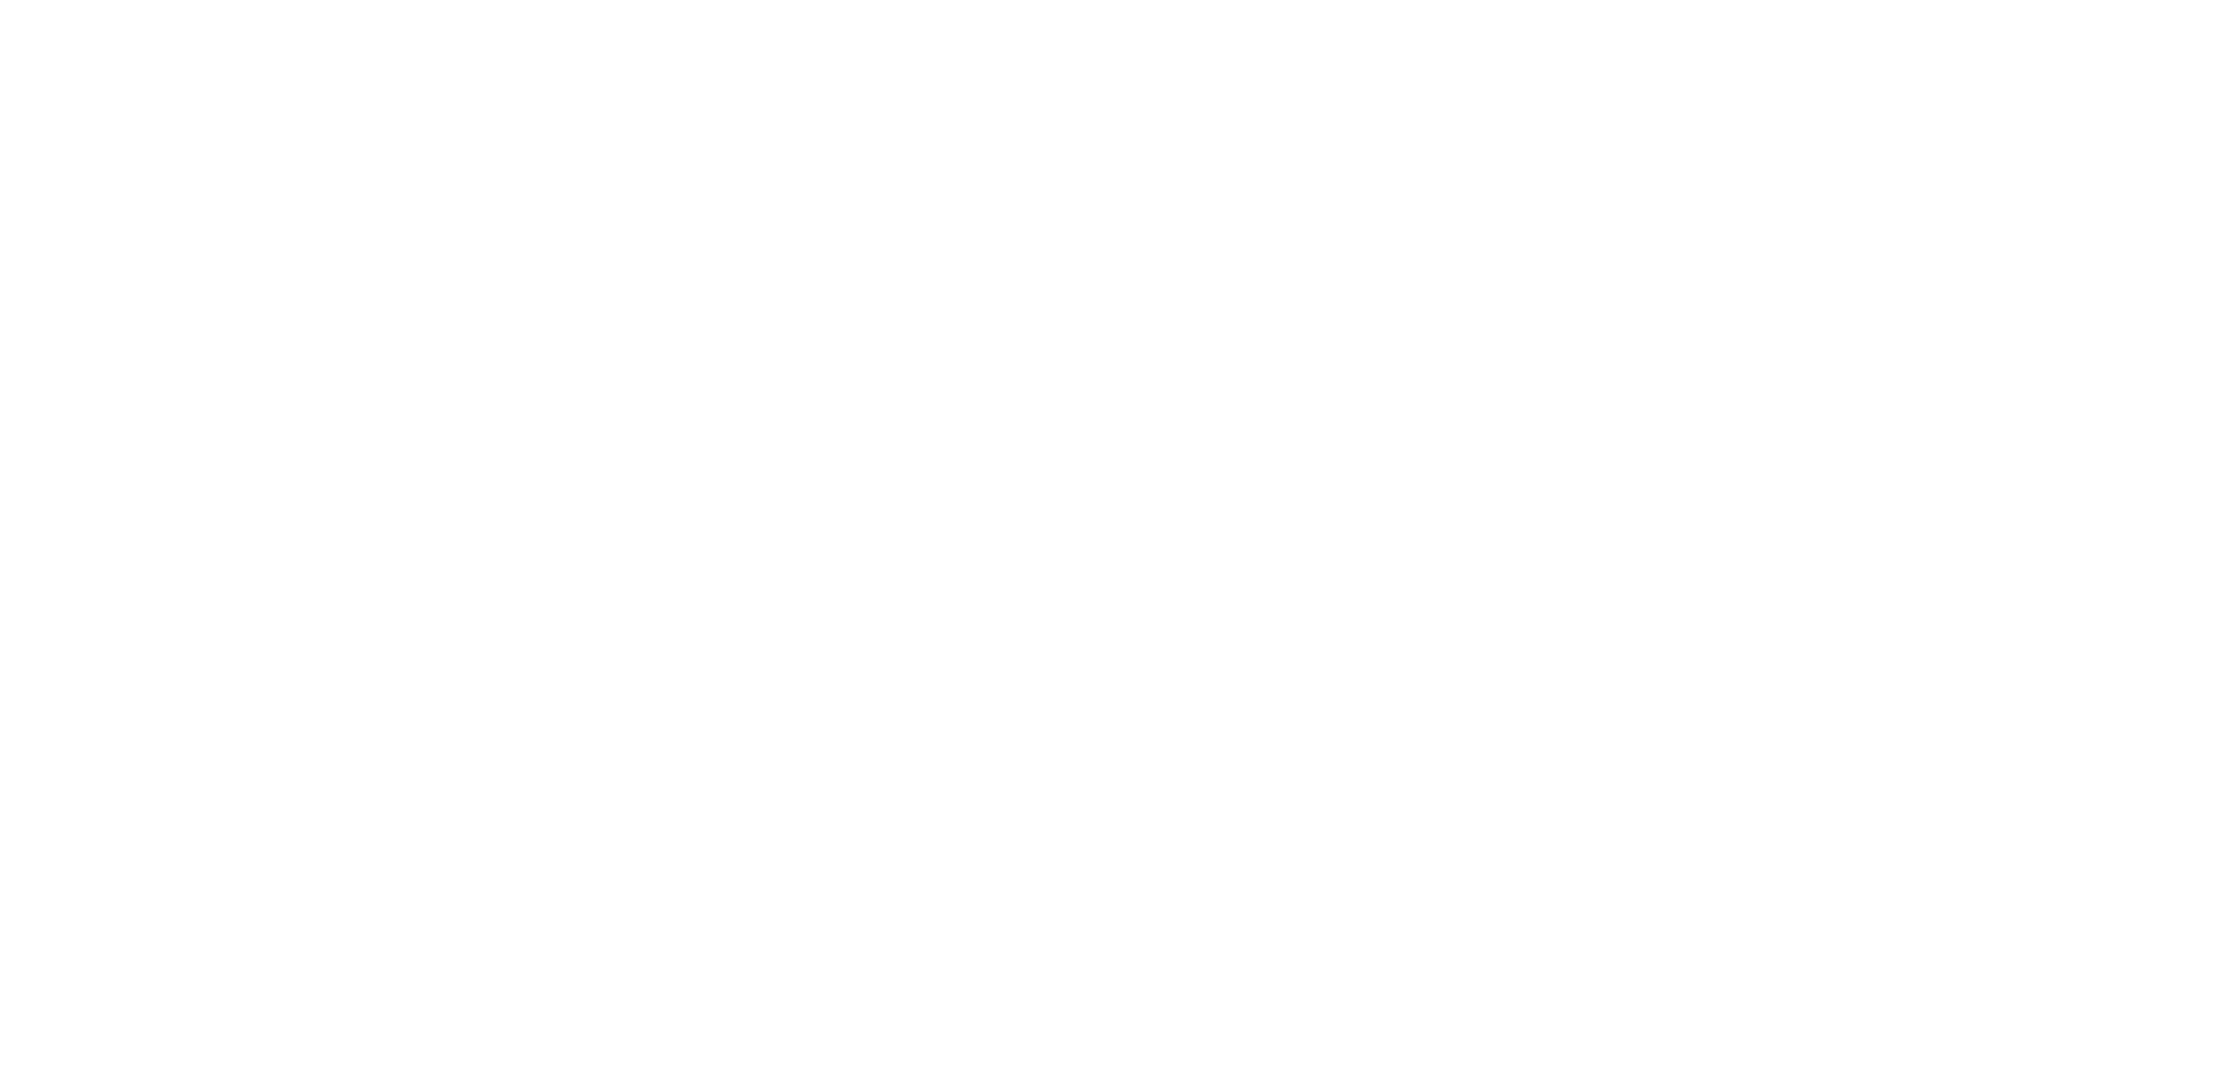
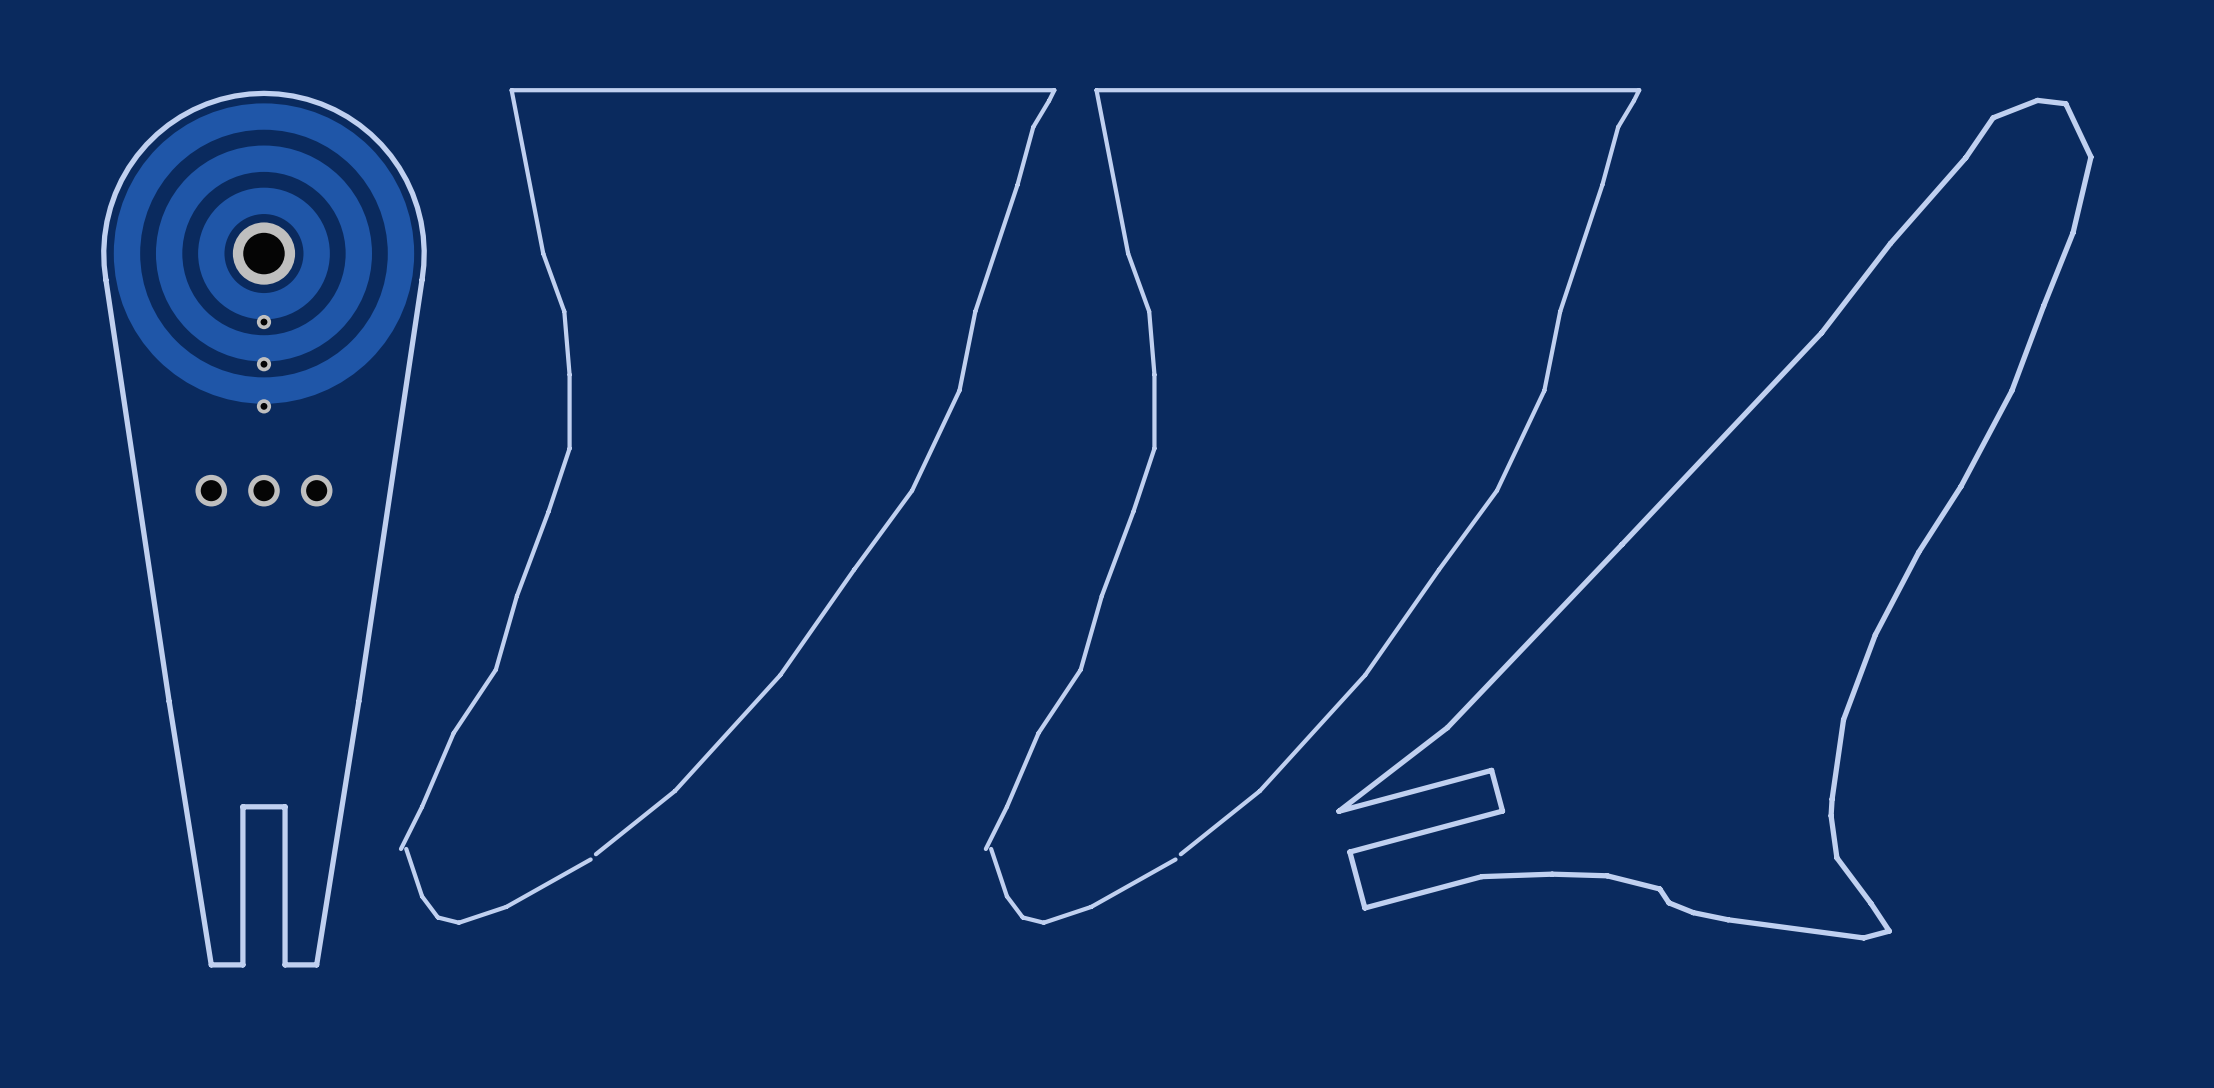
board edge: none -> (2037, 100) (1993, 117) (1965, 157) (1890, 243) (1821, 332) (1622, 544) (1447, 727) (1338, 811) (1491, 770) (1502, 811) (1349, 852) (1364, 907) (1481, 876) (1552, 874) (1607, 875) (1659, 888) (1668, 902) (1693, 912) (1728, 919) (1863, 937) (1889, 931) (1836, 857) (1831, 815) (1843, 719) (1875, 634) (1918, 552) (1961, 486) (2011, 390) (2073, 232) (2090, 157) (2065, 103) (2037, 100)
drawing: none -> [113, 103, 415, 404]
via: none -> (263, 253)
board edge: none -> (422, 279) (358, 701) (316, 964) (285, 964) (285, 806) (242, 806) (242, 964) (211, 964) (169, 701) (105, 279) (103, 250) (110, 207) (121, 180) (137, 155) (157, 134) (180, 116) (206, 103) (234, 96) (263, 93) (293, 96) (321, 103) (359, 125) (381, 144) (399, 167) (412, 193) (421, 221) (424, 250) (422, 279)
via: none -> (263, 322)
via: none -> (263, 364)
via: none -> (263, 406)
via: none -> (211, 490)
via: none -> (263, 490)
via: none -> (316, 490)
board edge: none -> (400, 848) (422, 806) (453, 733) (495, 669) (516, 596) (569, 448) (569, 374) (564, 311) (543, 253) (511, 90) (1054, 90) (1033, 127) (1017, 185) (975, 311) (959, 390) (912, 490) (780, 675) (674, 791) (595, 854)
board edge: none -> (406, 848) (422, 896) (437, 917) (458, 922) (506, 906) (590, 859)
board edge: none -> (985, 848) (1006, 806) (1038, 733) (1080, 669) (1101, 596) (1154, 448) (1154, 374) (1149, 311) (1128, 253) (1096, 90) (1639, 90) (1618, 127) (1602, 185) (1560, 311) (1544, 390) (1496, 490) (1365, 675) (1259, 791) (1180, 854)
board edge: none -> (991, 848) (1006, 896) (1022, 917) (1043, 922) (1091, 906) (1175, 859)

